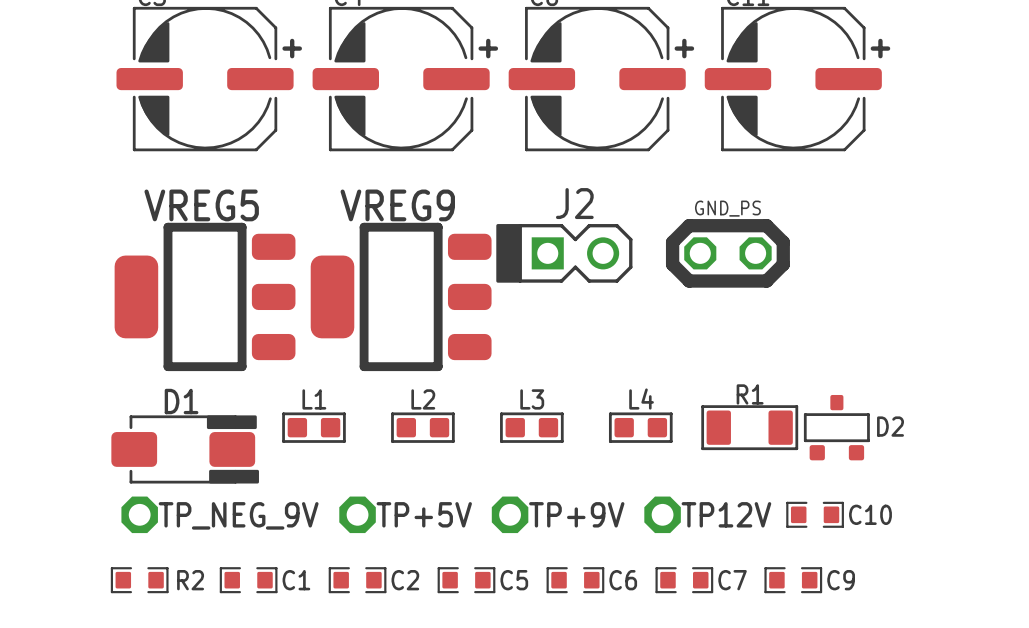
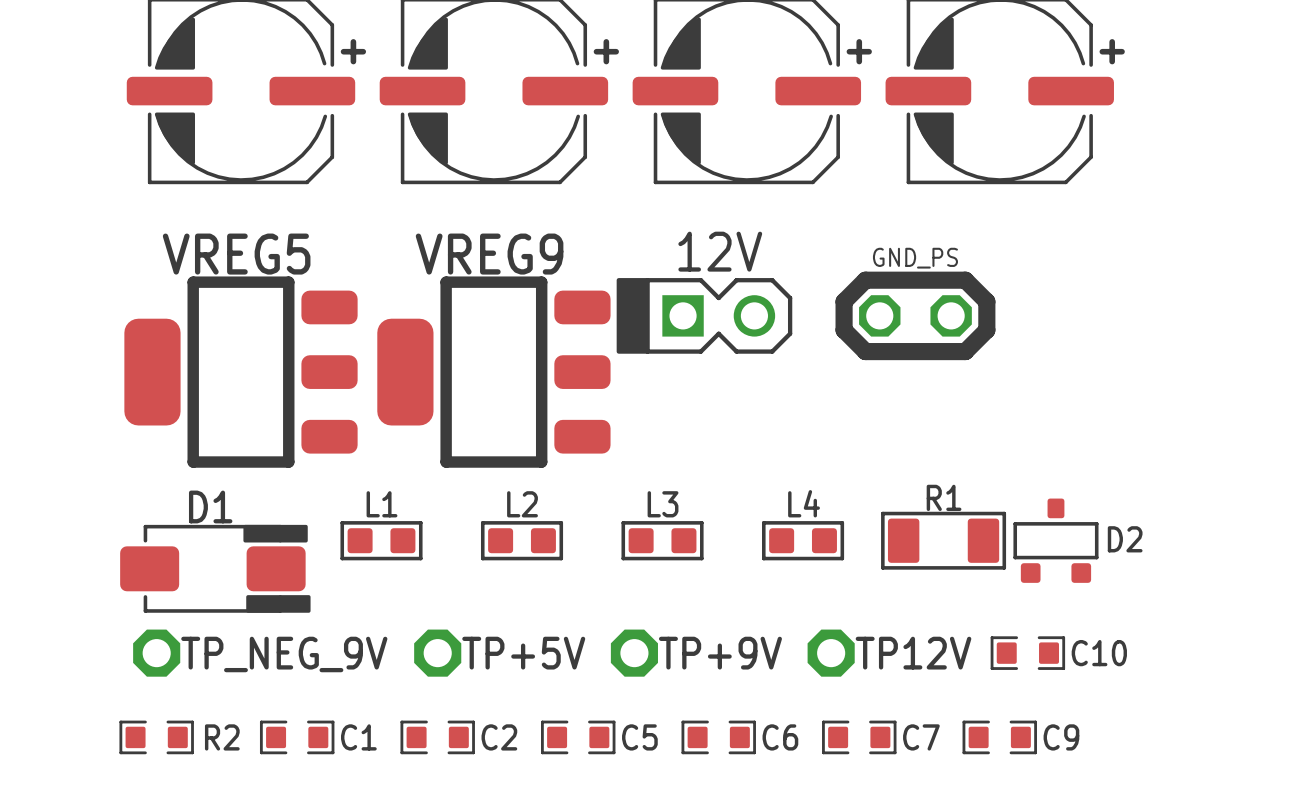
J2 name: J2 (574, 203) -> 12V (720, 251)

